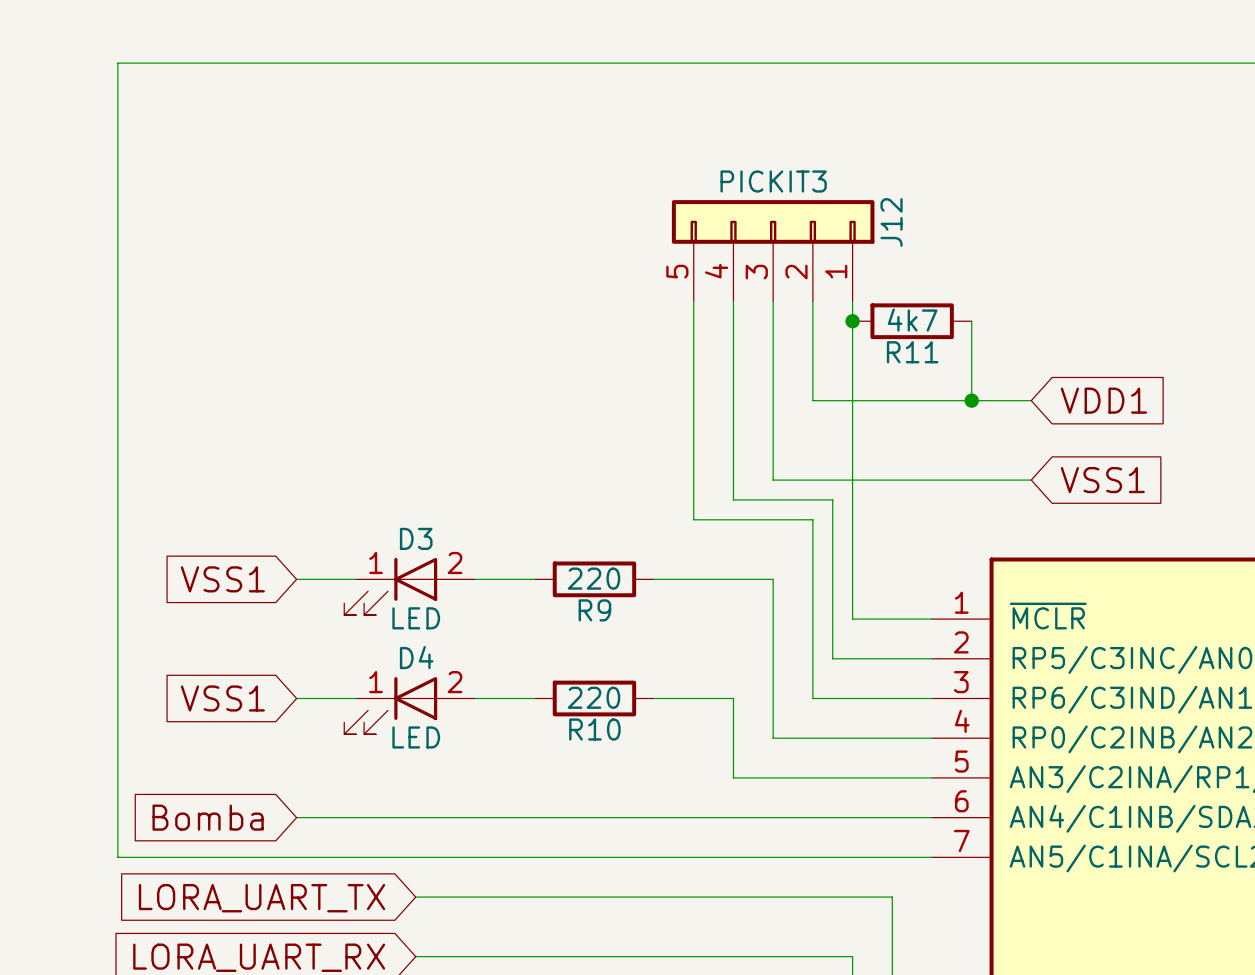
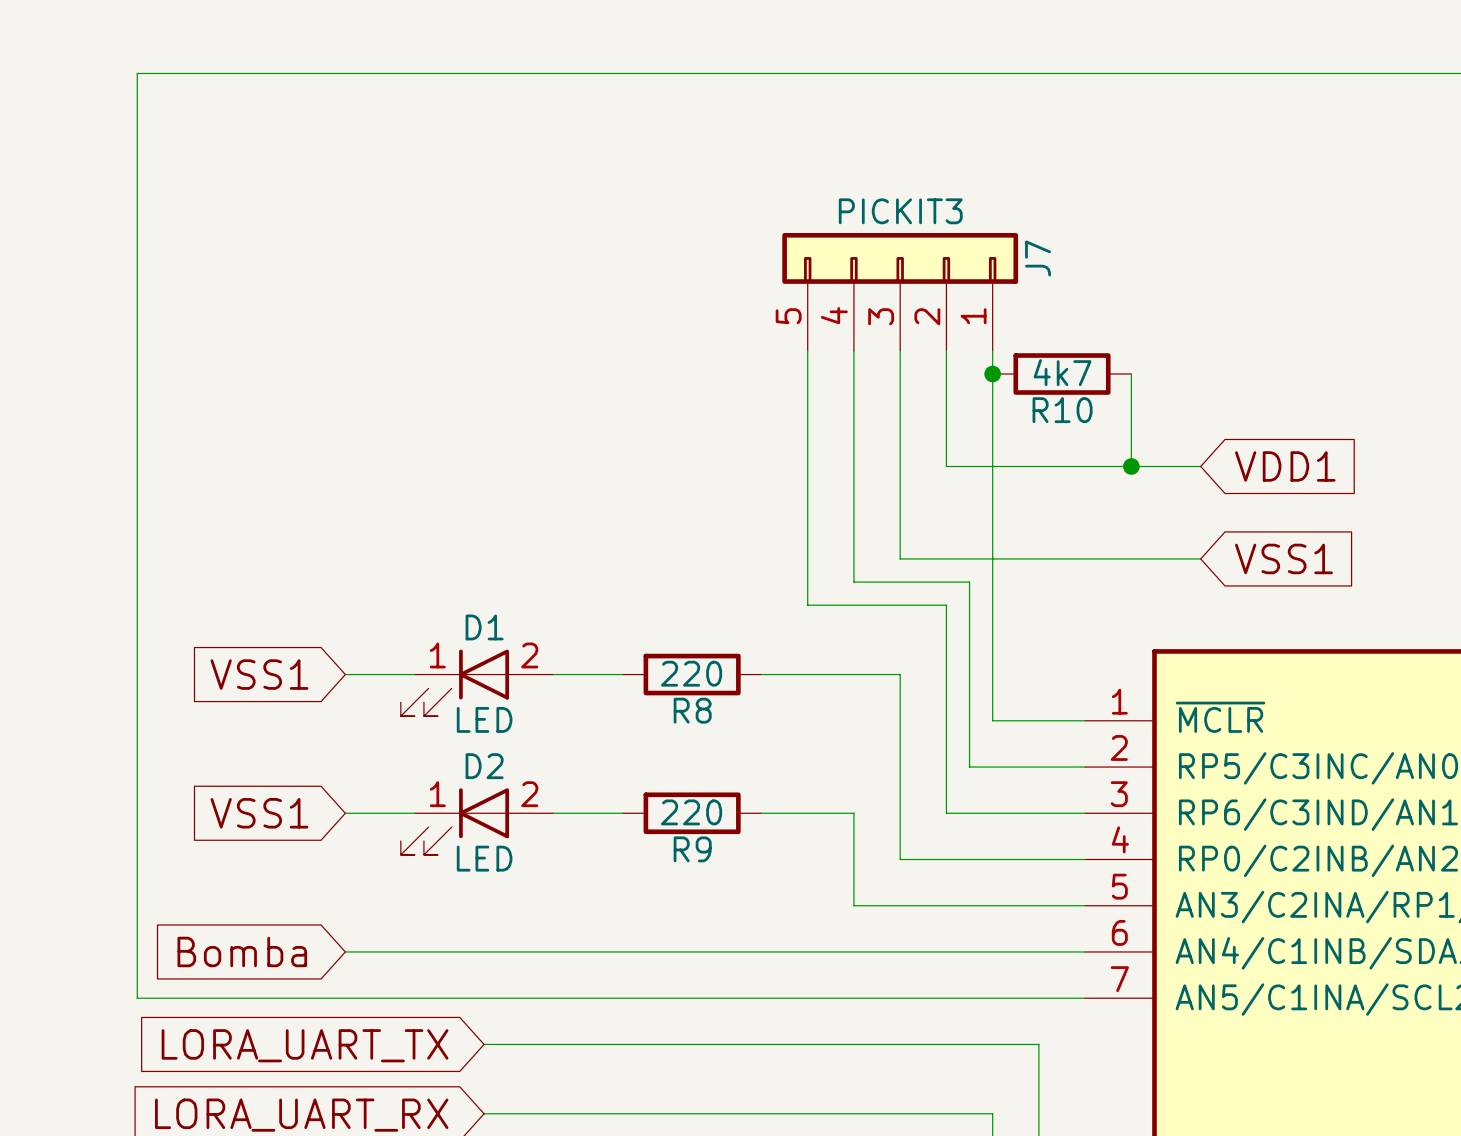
J12 name: J12 (891, 222) -> J7 (1038, 258)
R11 name: R11 (912, 352) -> R10 (1062, 410)
D3 name: D3 (416, 538) -> D1 (484, 627)
R9 name: R9 (594, 610) -> R8 (692, 710)
D4 name: D4 (416, 657) -> D2 (484, 766)
R10 name: R10 (594, 729) -> R9 (692, 849)

